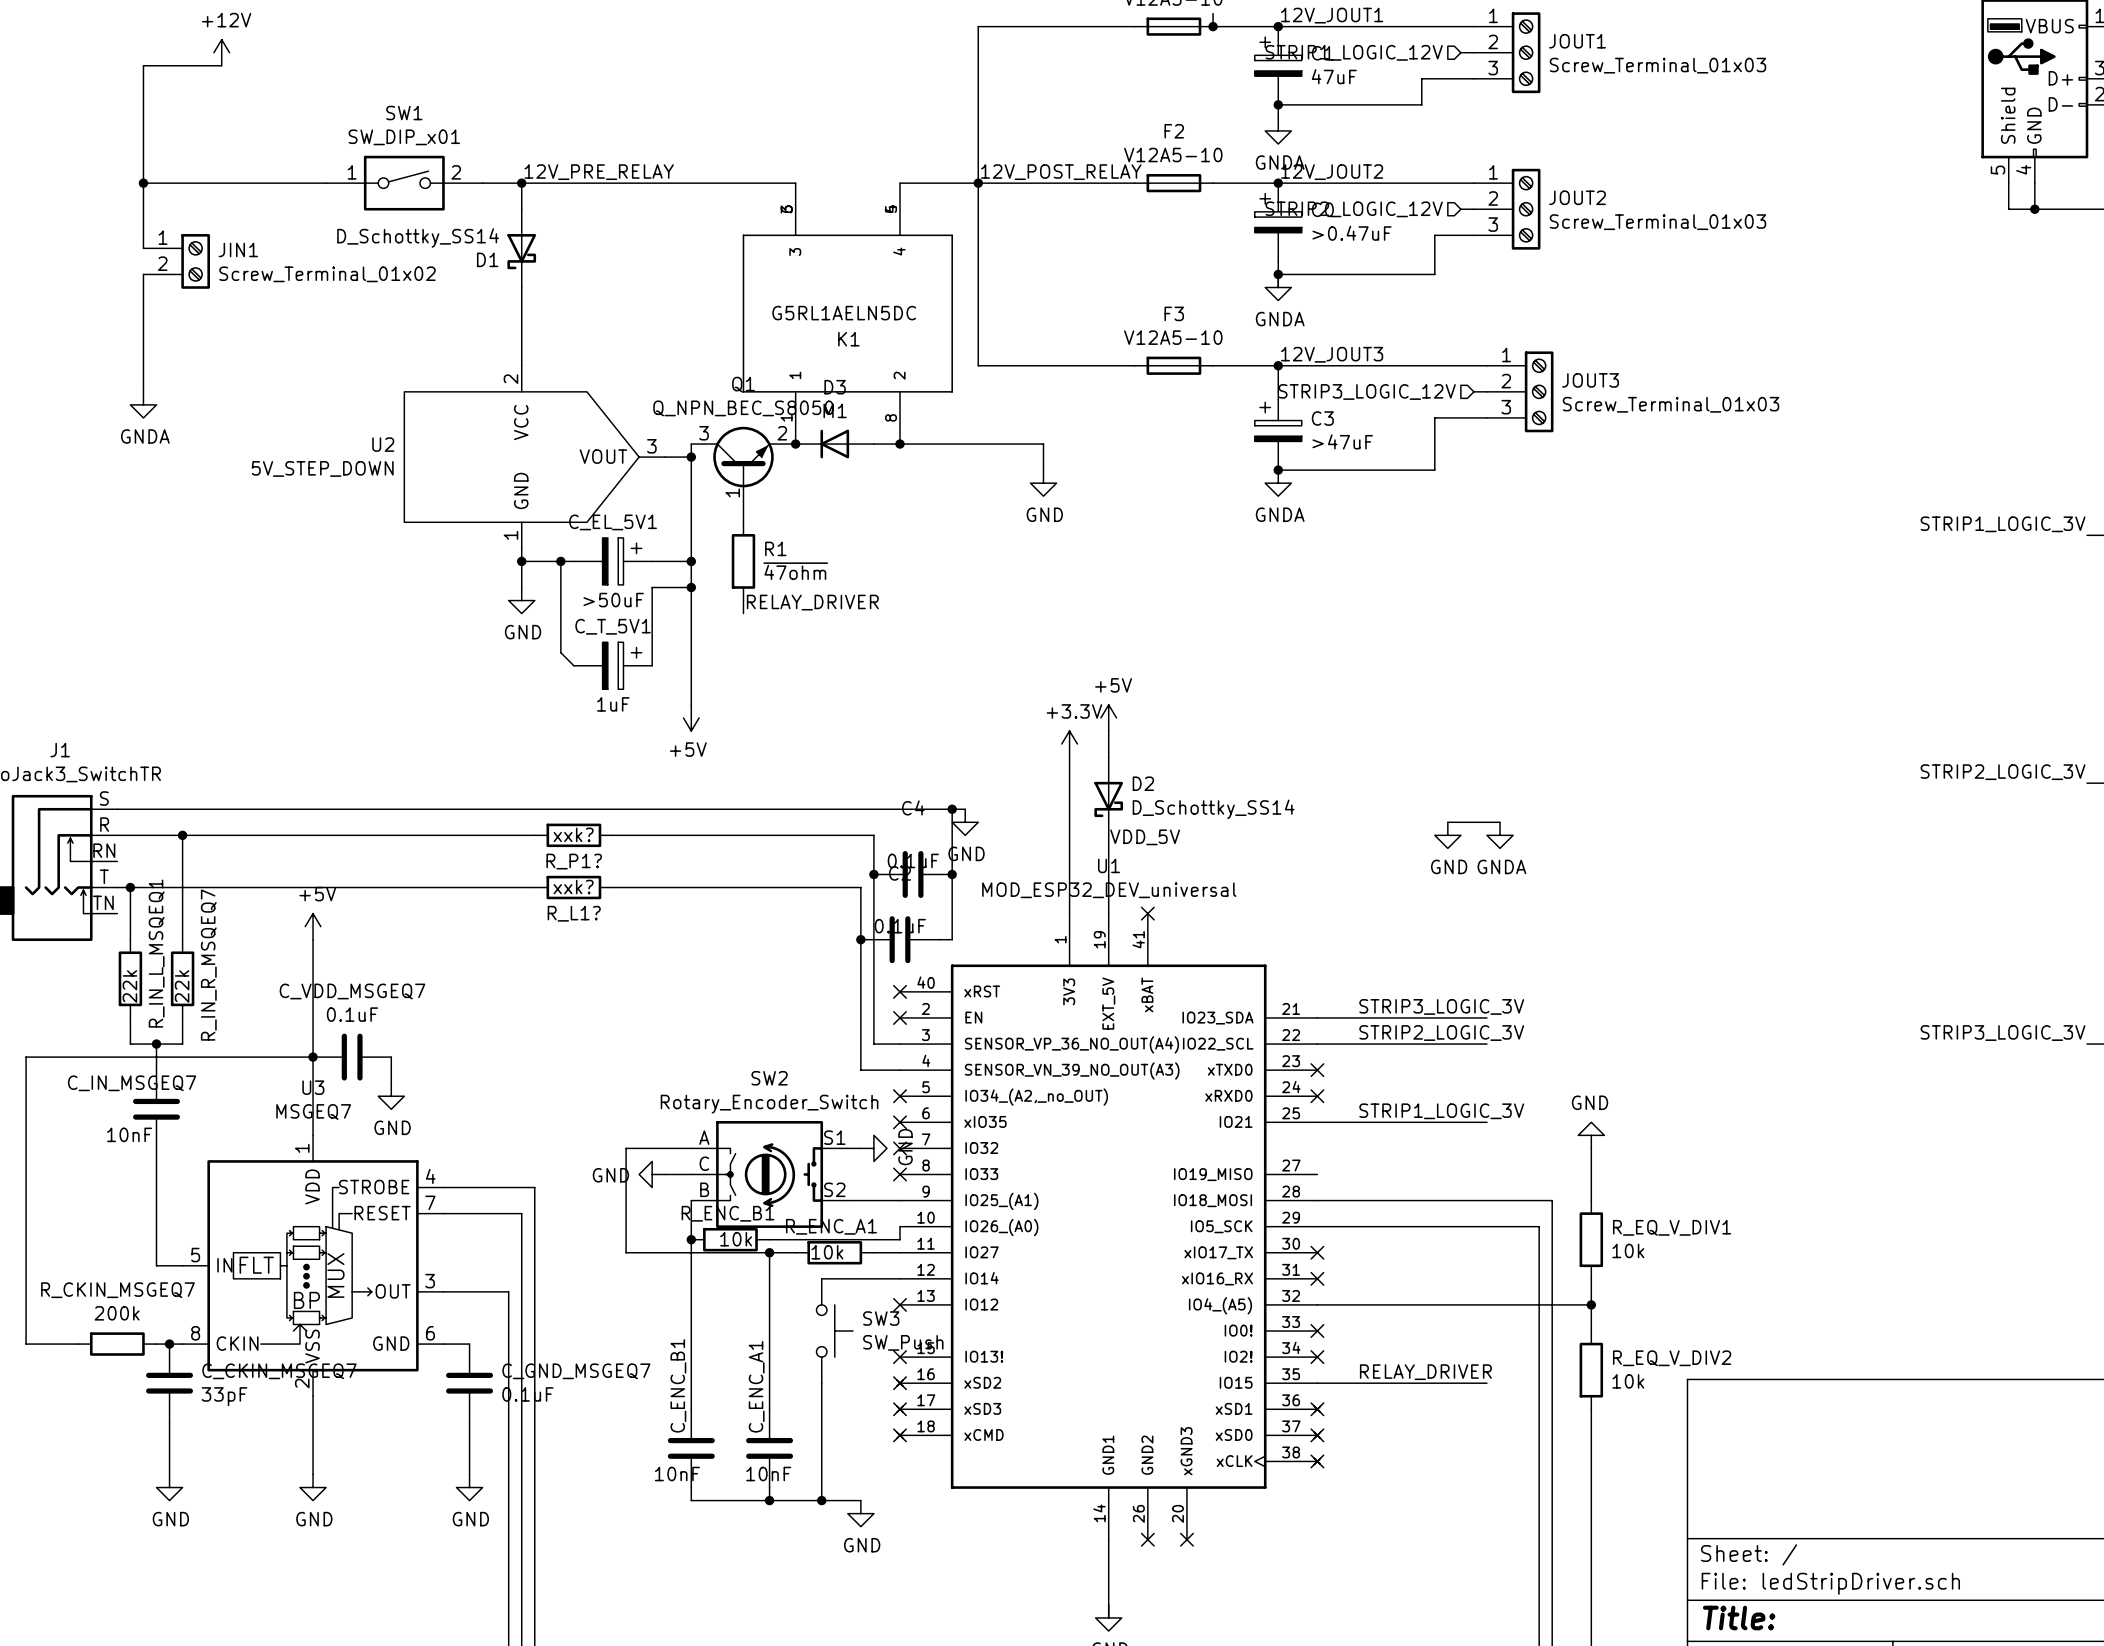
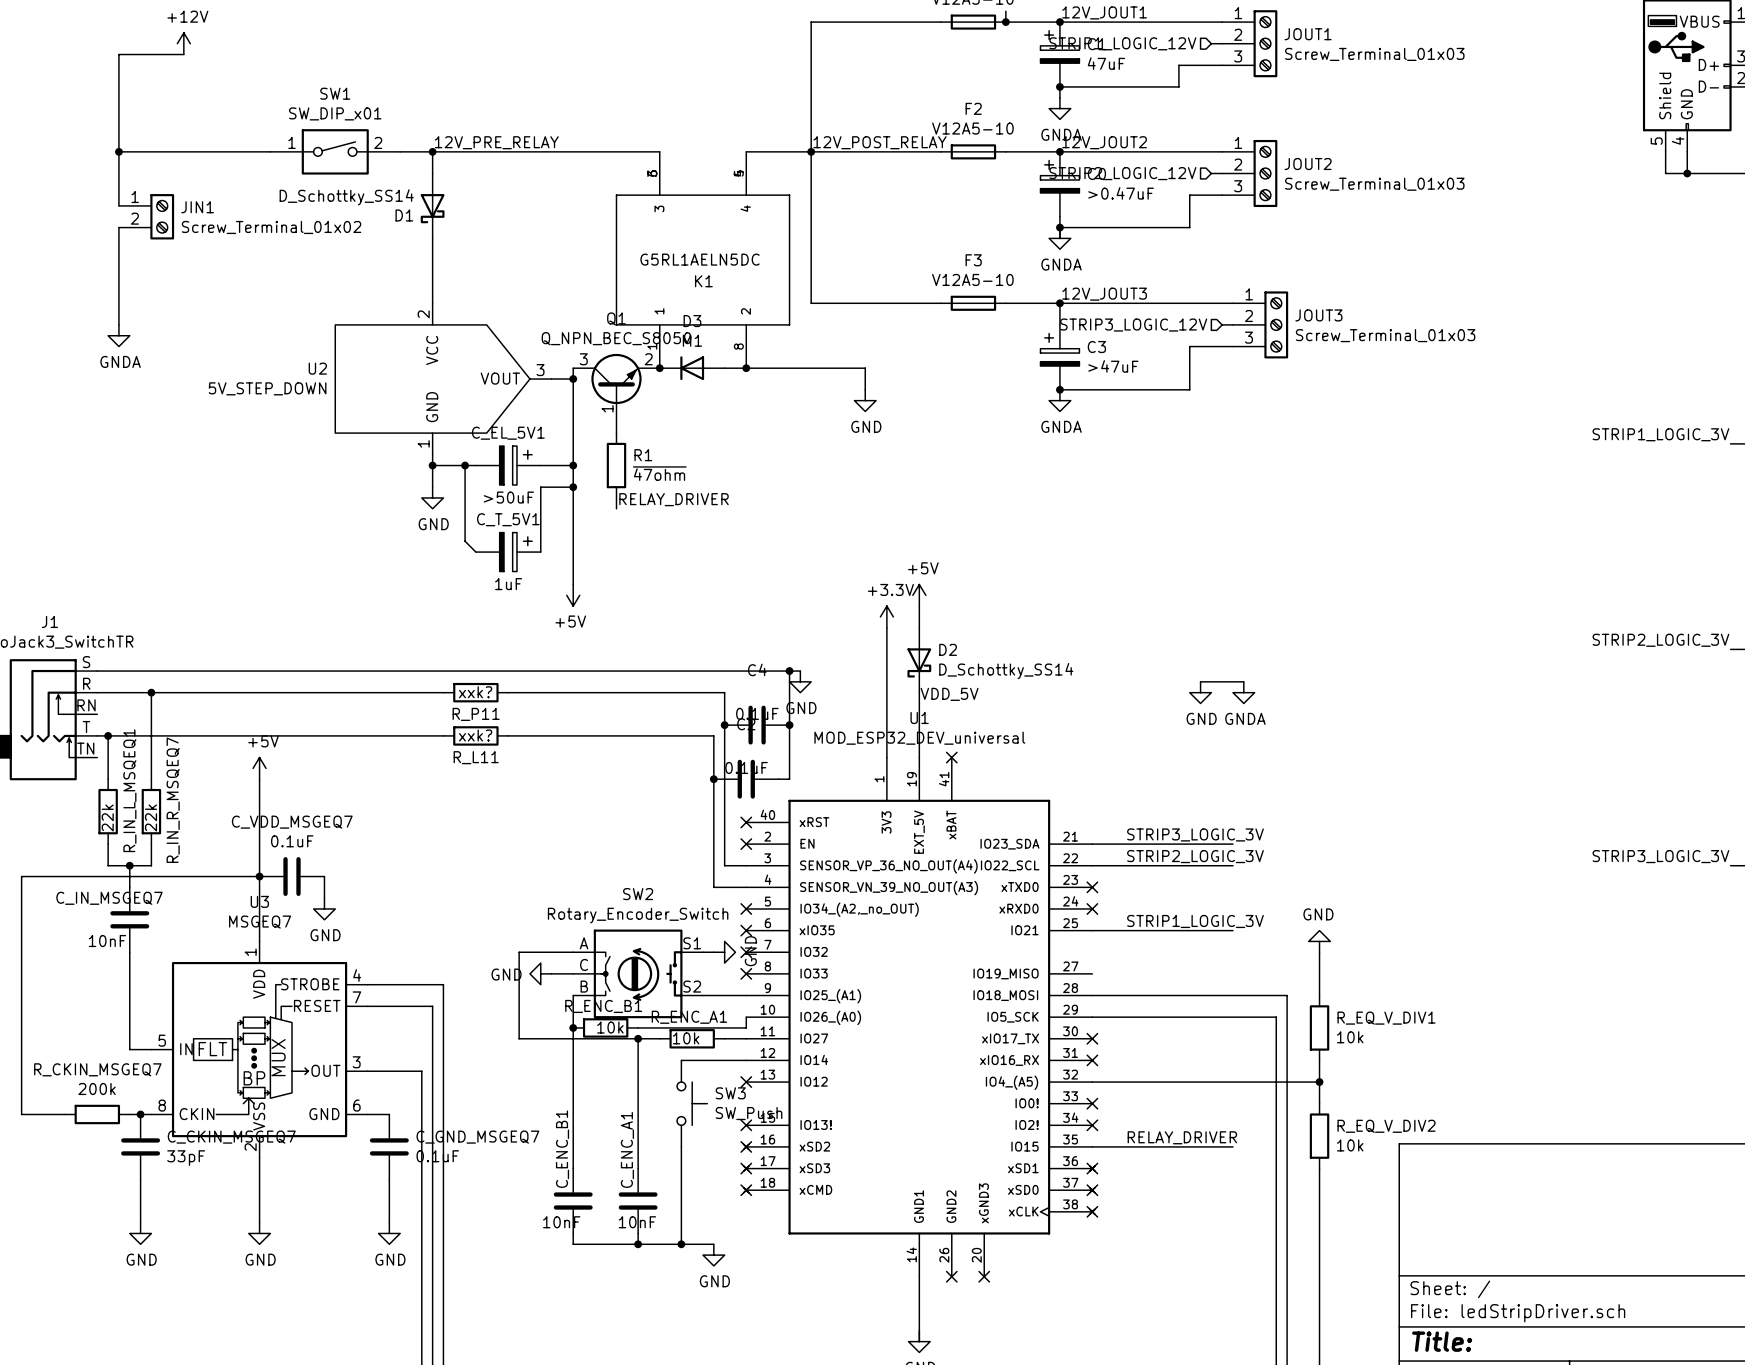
R_P1? name: R_P1? (574, 861) -> R_P11 (476, 714)
R_L1? name: R_L1? (574, 913) -> R_L11 (476, 757)

